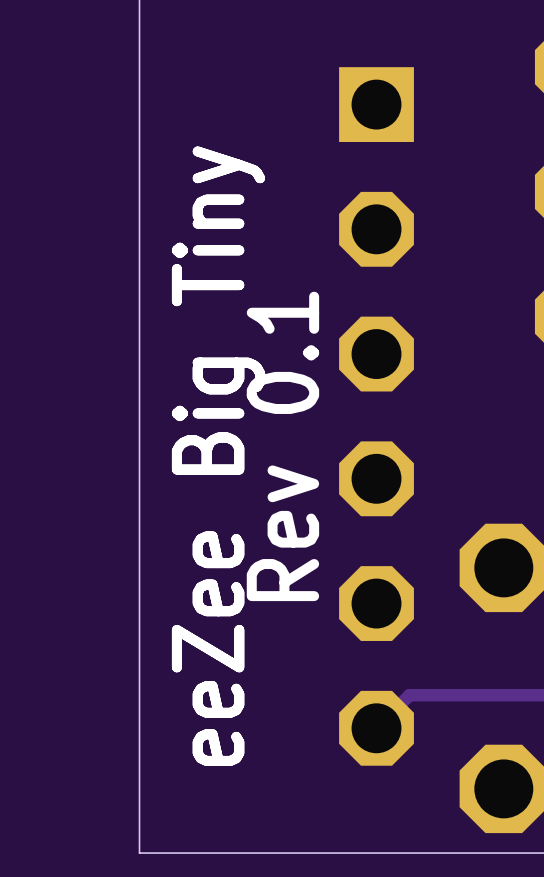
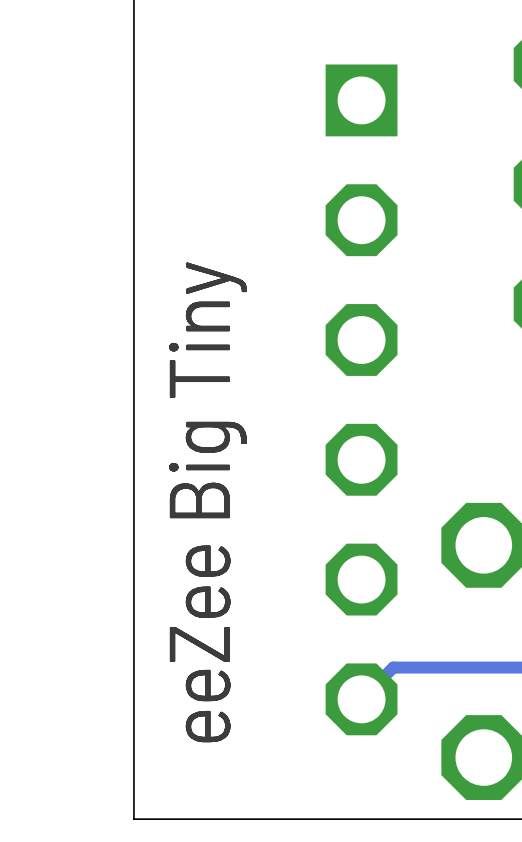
text: Rev 0.1 (282, 446) -> none

